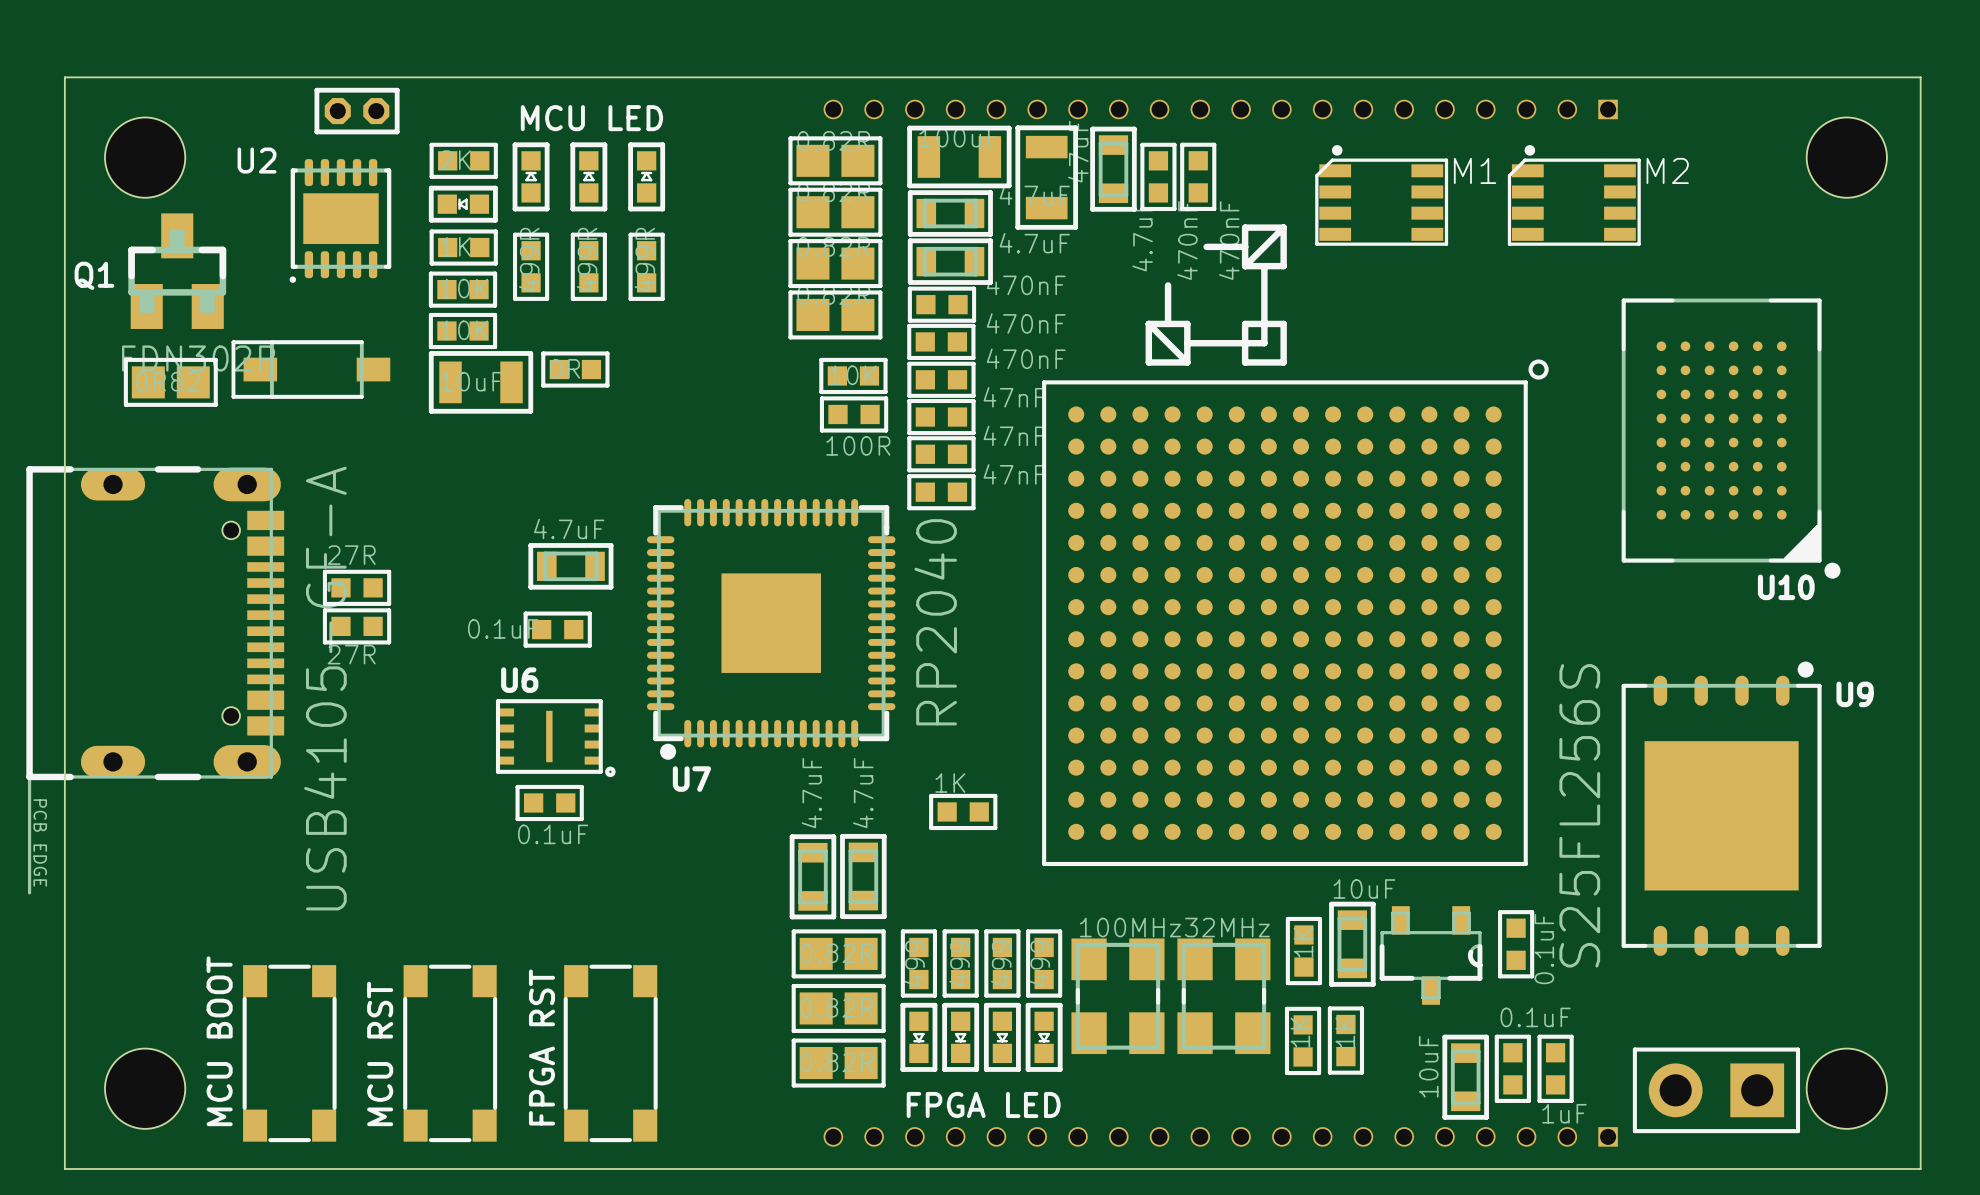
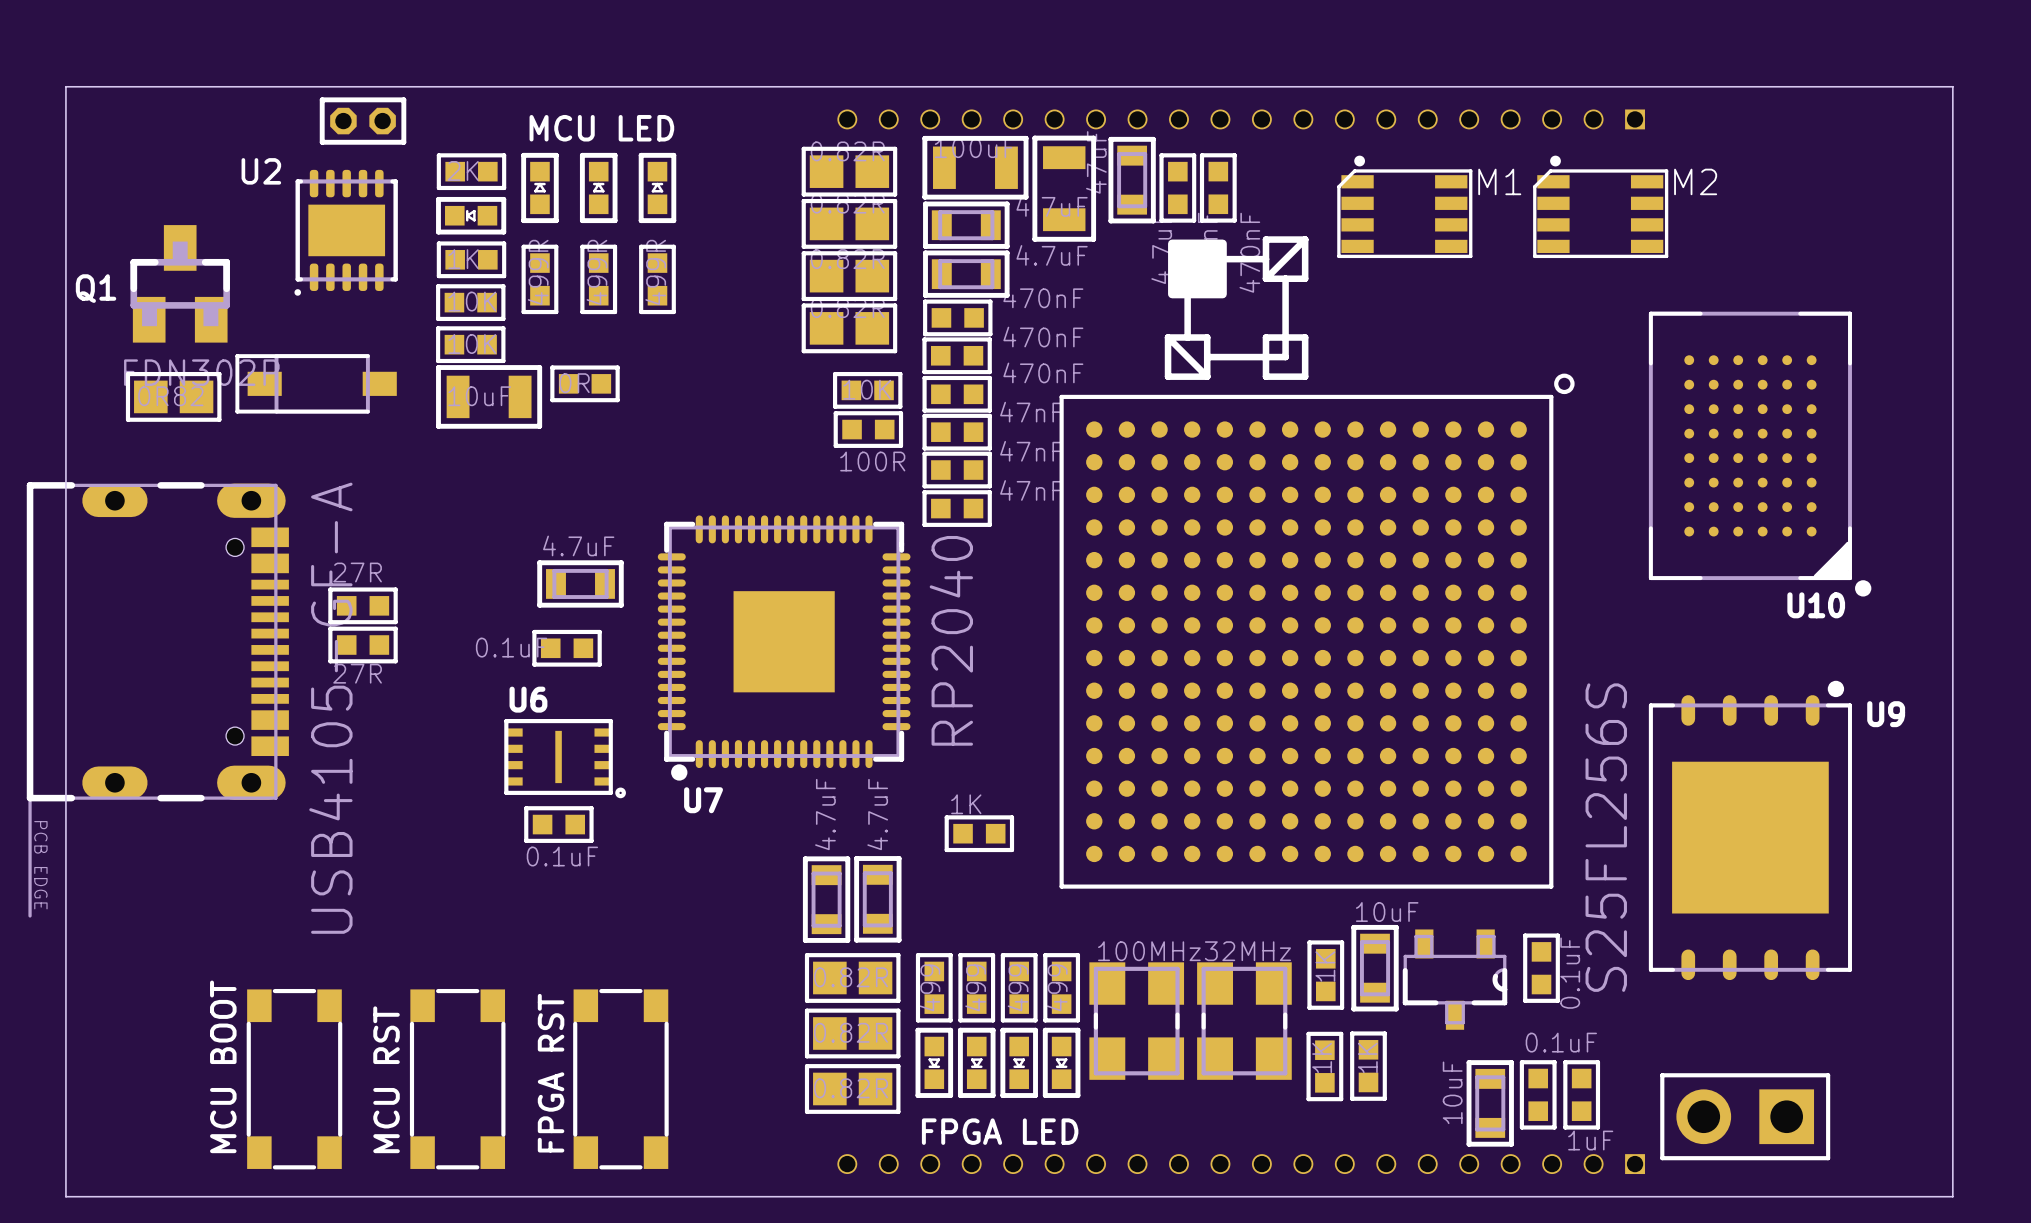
part: (145, 157) -> none
part: (1846, 157) -> none
drawing: none -> [1168, 239, 1227, 299]
part: (145, 1088) -> none
part: (1846, 1088) -> none

